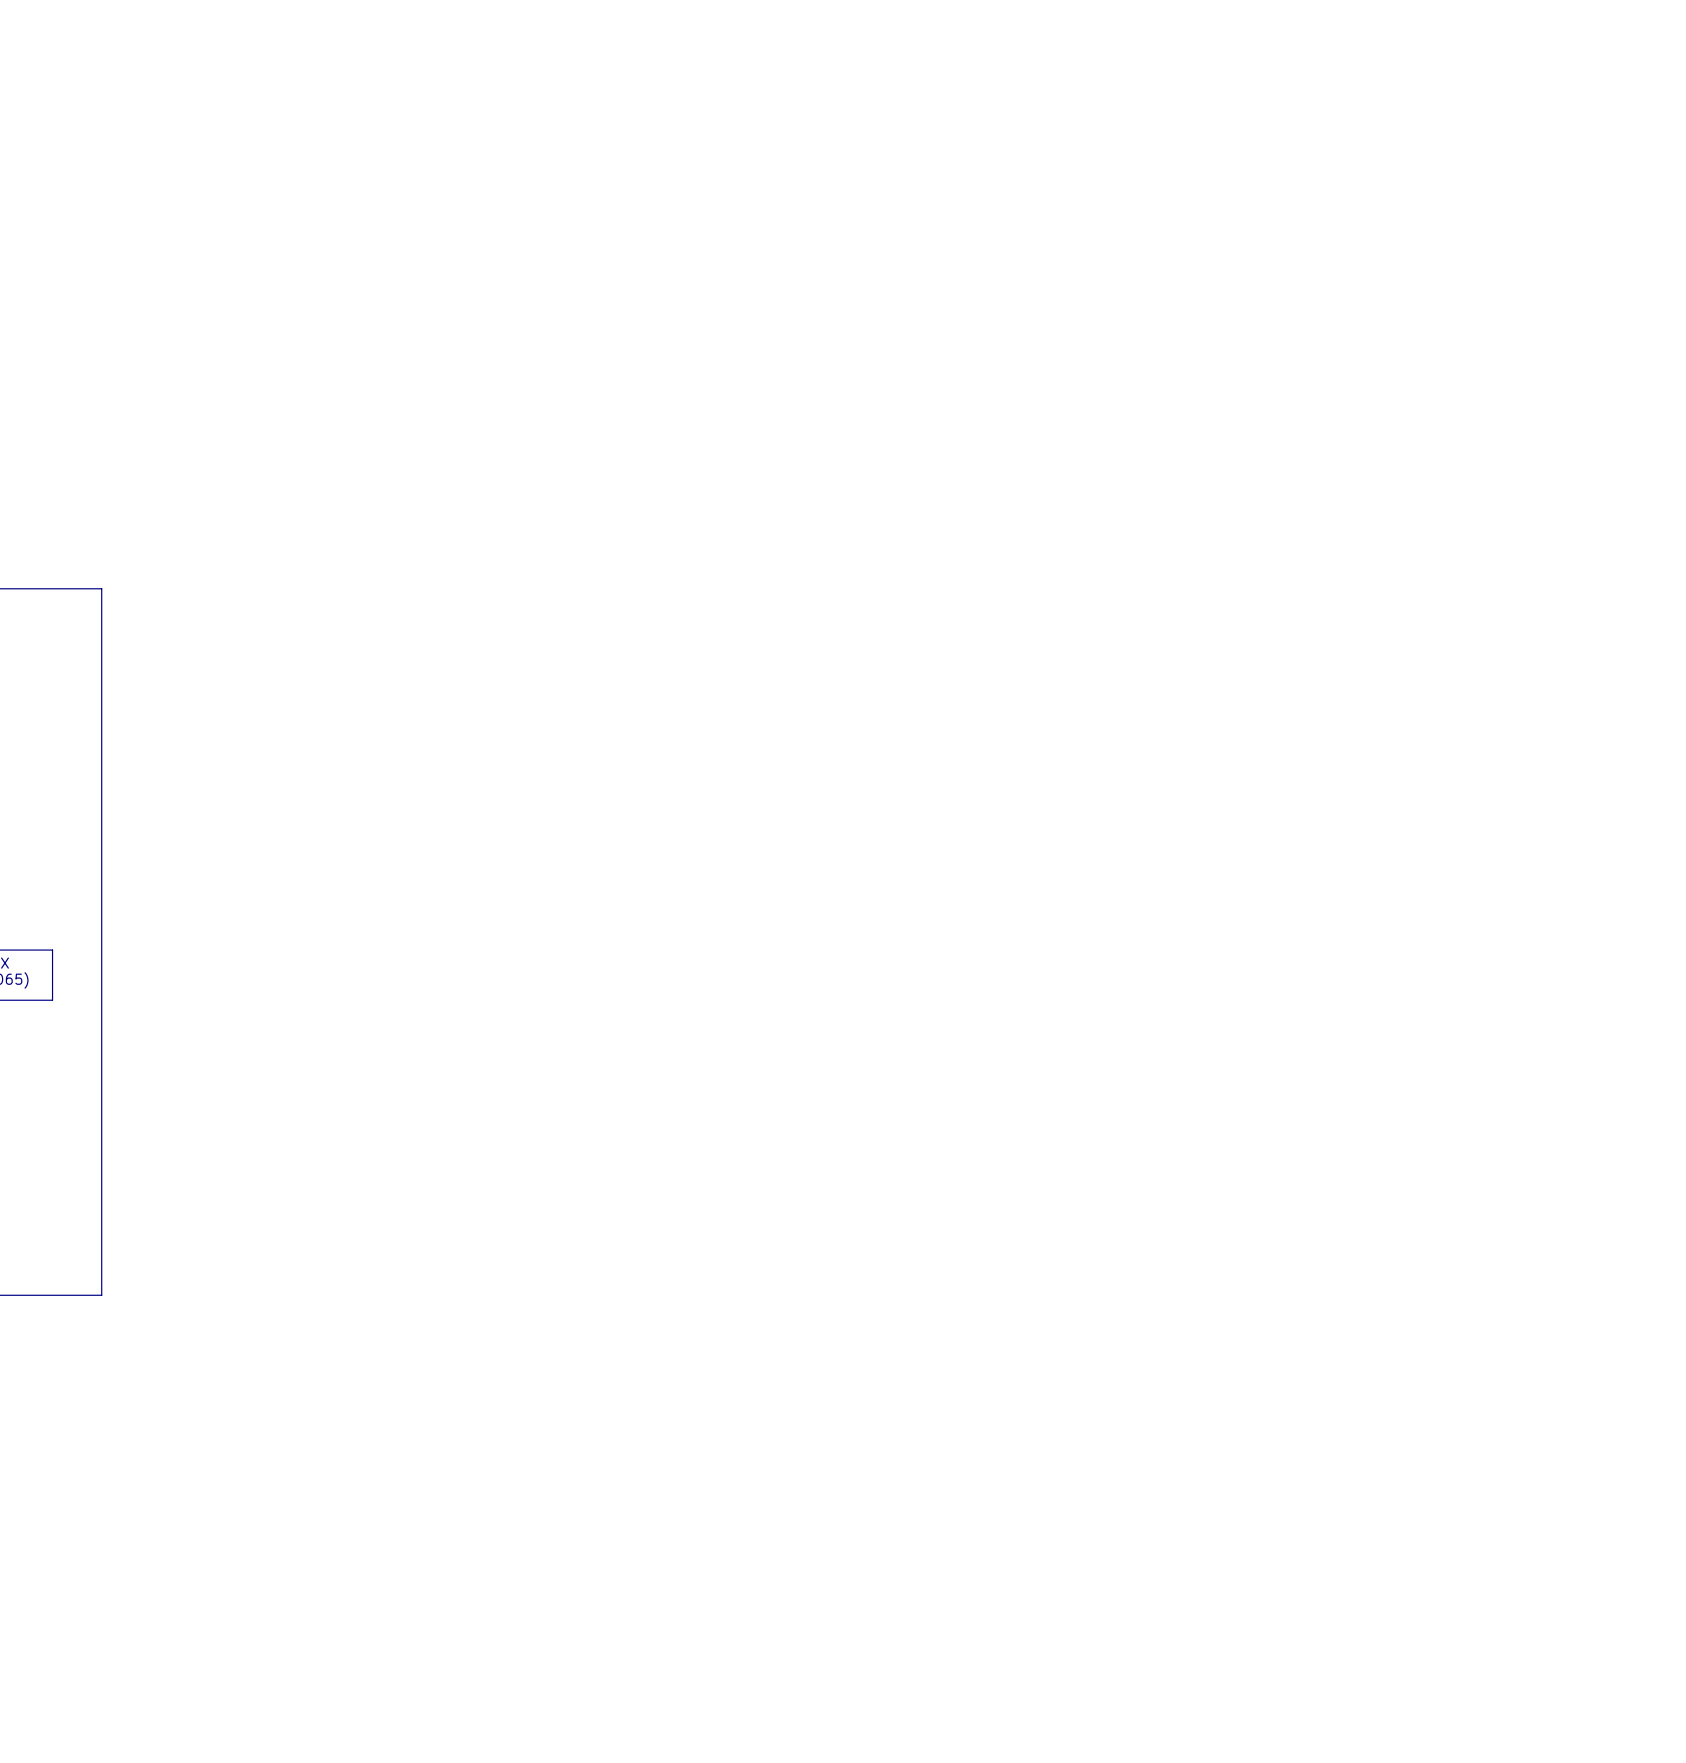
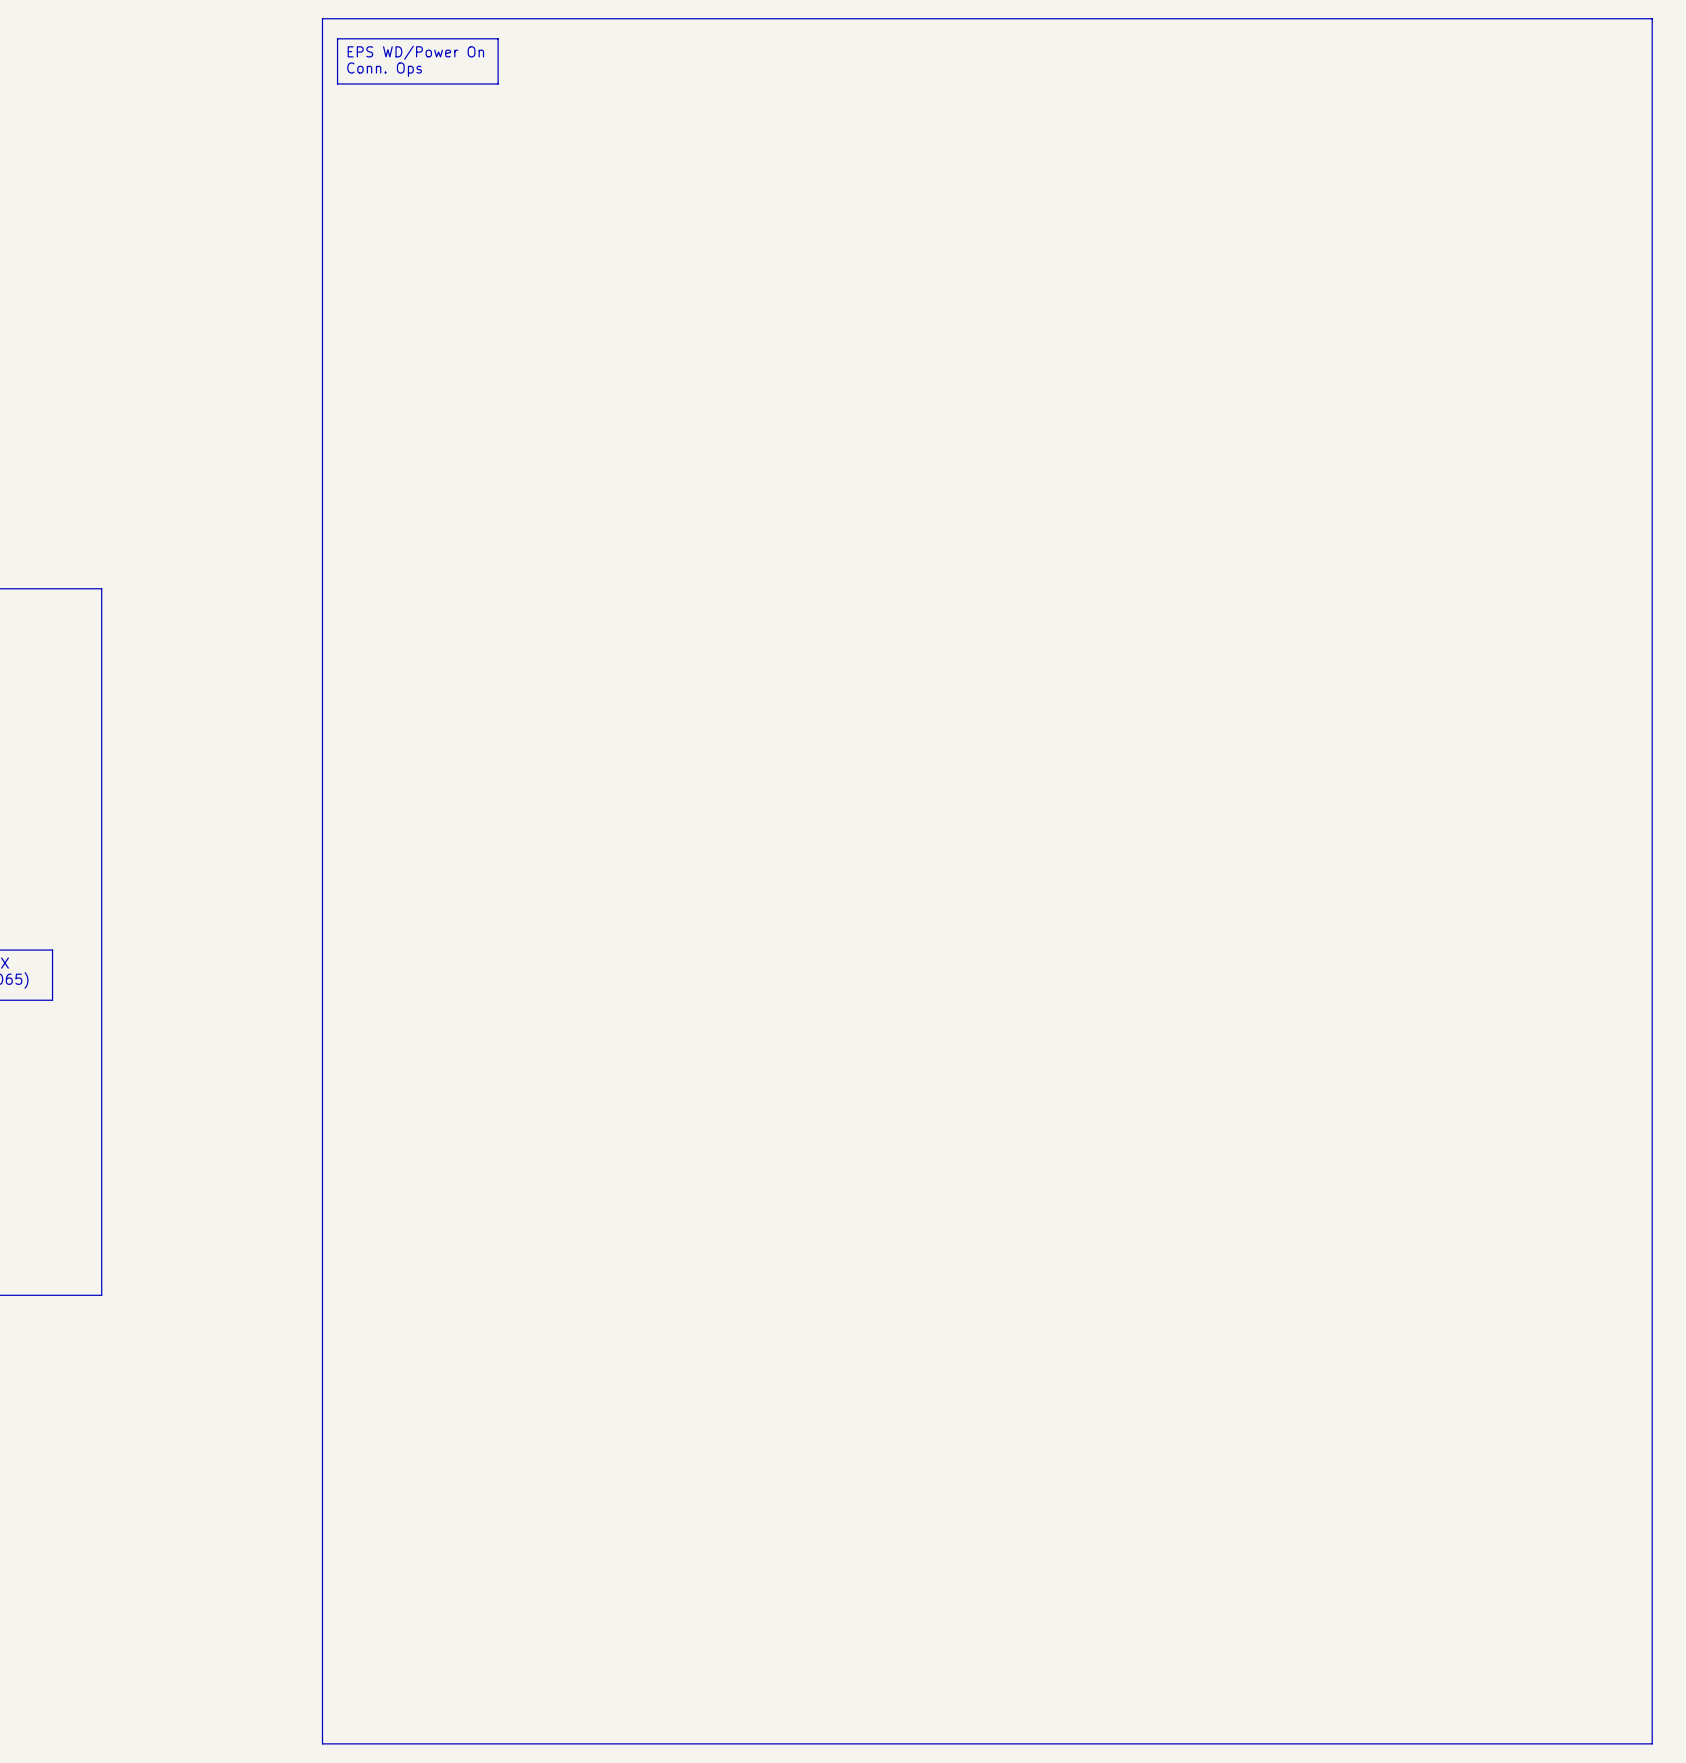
line: none -> (322, 18) (1652, 18) (1652, 1743) (322, 1743) (322, 18)
line: none -> (337, 38) (498, 38) (498, 83) (337, 83) (337, 38)
text: none -> EPS WD/Power On (415, 52)
text: none -> Conn. Ops (384, 69)

